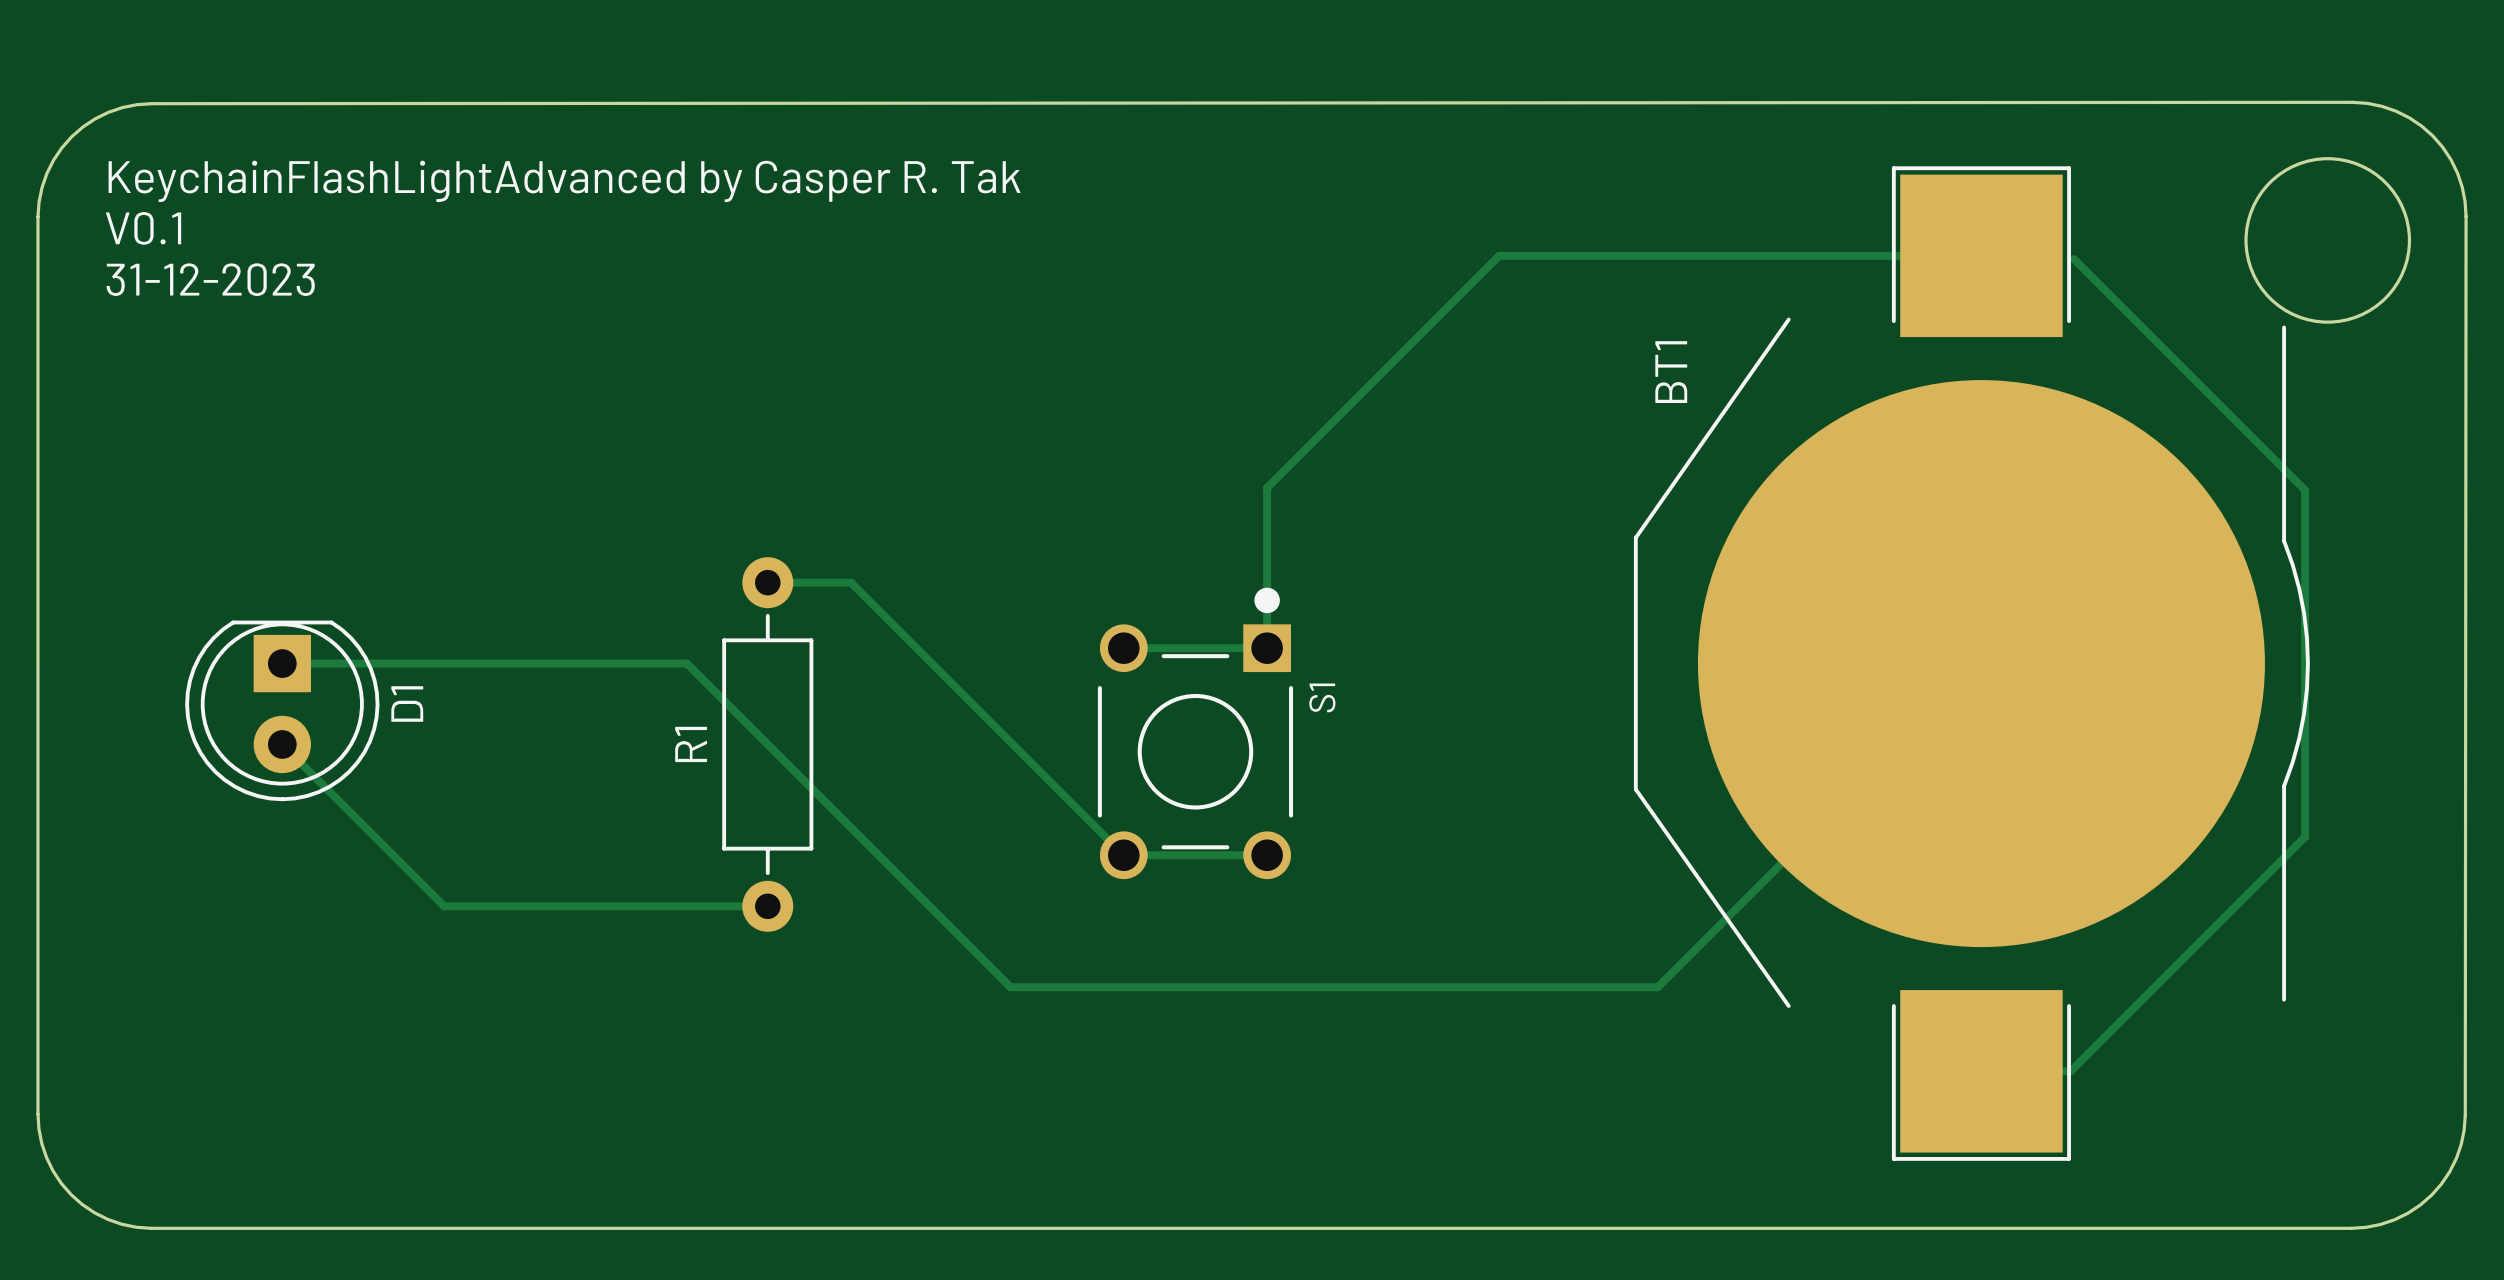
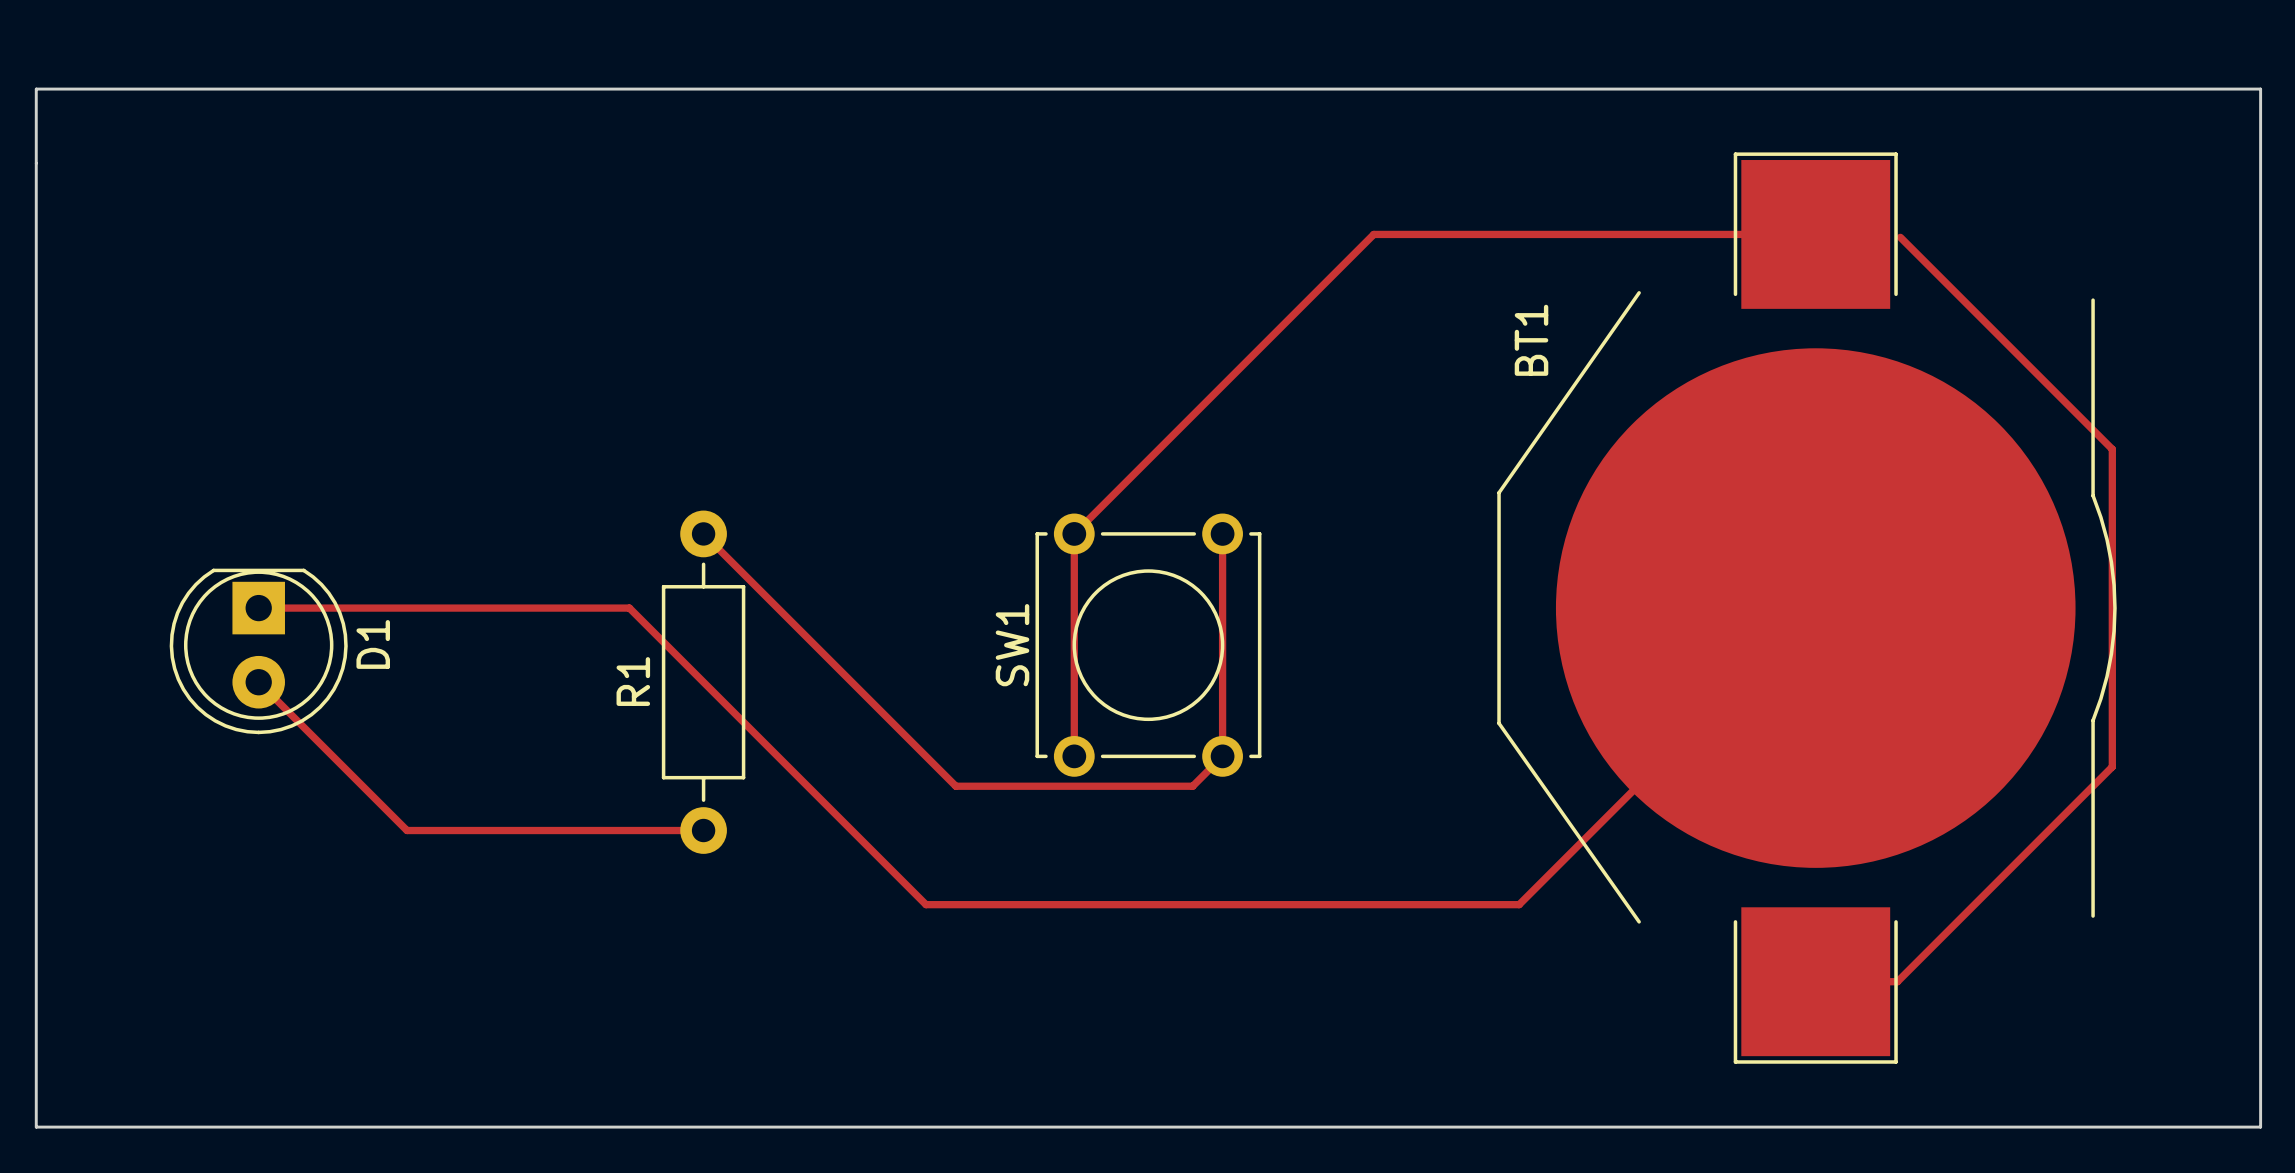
board edge: (2352, 102) (152, 103) (137, 104) (108, 112) (82, 127) (61, 147) (46, 173) (42, 187) (37, 216) (37, 1114) (38, 1129) (46, 1157) (61, 1183) (82, 1204) (107, 1219) (121, 1224) (151, 1228) (2351, 1228) (2366, 1227) (2394, 1219) (2420, 1204) (2441, 1184) (2456, 1158) (2461, 1144) (2465, 1115) (2466, 216) (2465, 201) (2457, 172) (2442, 147) (2432, 136) (2421, 126) (2396, 111) (2367, 103) (2352, 102) -> (36, 89) (36, 1127) (2260, 1127) (2260, 89) (36, 89)
round board edge: [2244, 157, 2412, 324] -> none
text: KeychainFlashLightAdvanced by Casper R. Tak (564, 181) -> none
text: V0.1 (143, 228) -> none
text: 31-12-2023 (210, 279) -> none
track: (1267, 487) (1267, 648) (1123, 648) -> (1161, 447) (1074, 533) (1074, 756)
track: (767, 582) (851, 582) (1123, 855) (1267, 855) -> (703, 533) (955, 786) (1192, 786) (1222, 756) (1222, 533)
SW1: none -> (1148, 645)
S1: (1195, 733) -> none

